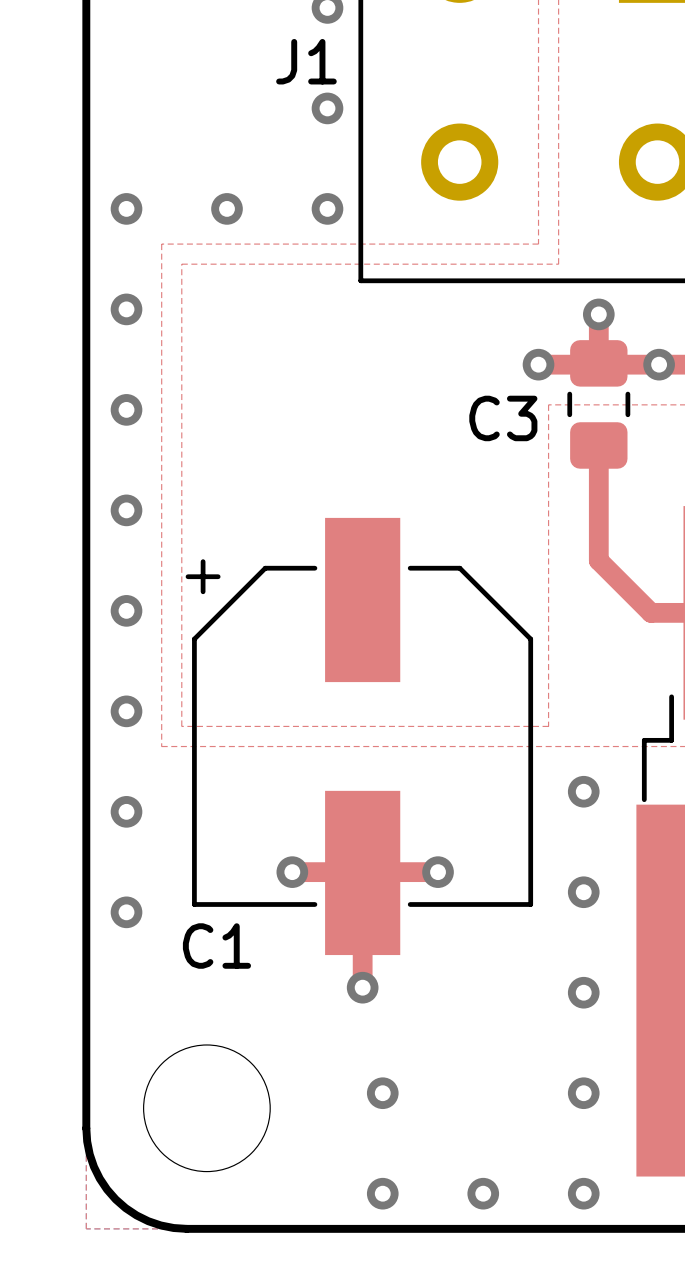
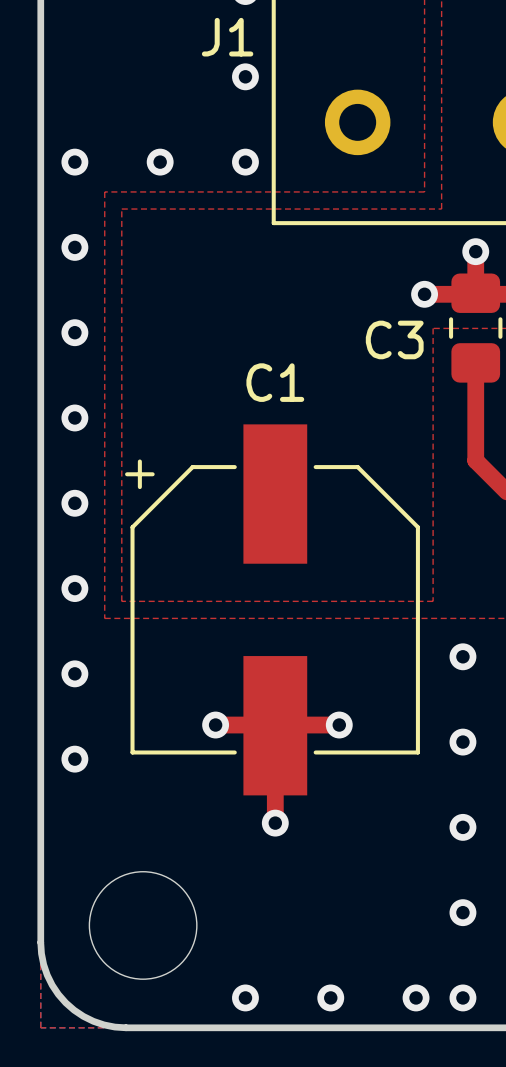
C1 name position: C1 (216, 946) -> C1 (275, 382)
via: (382, 1093) -> none
via: none -> (245, 997)
via: (382, 1193) -> none
via: none -> (330, 997)
via: (483, 1193) -> none
via: none -> (416, 997)

